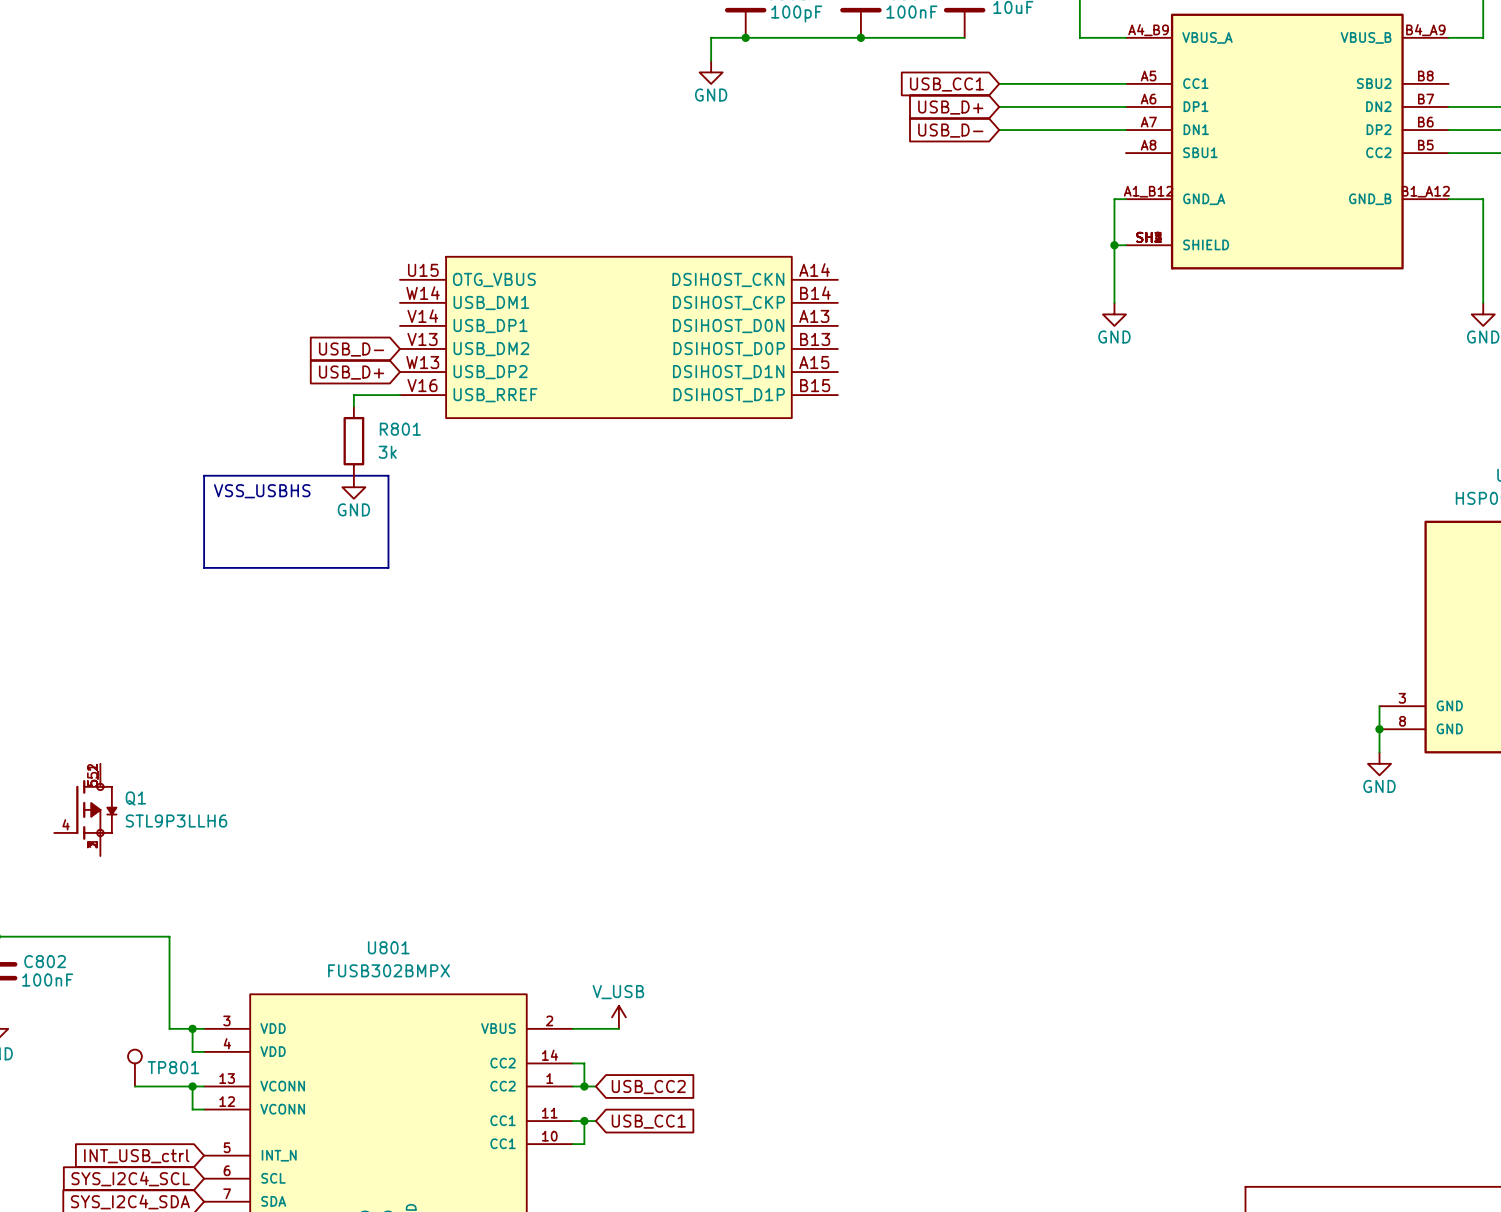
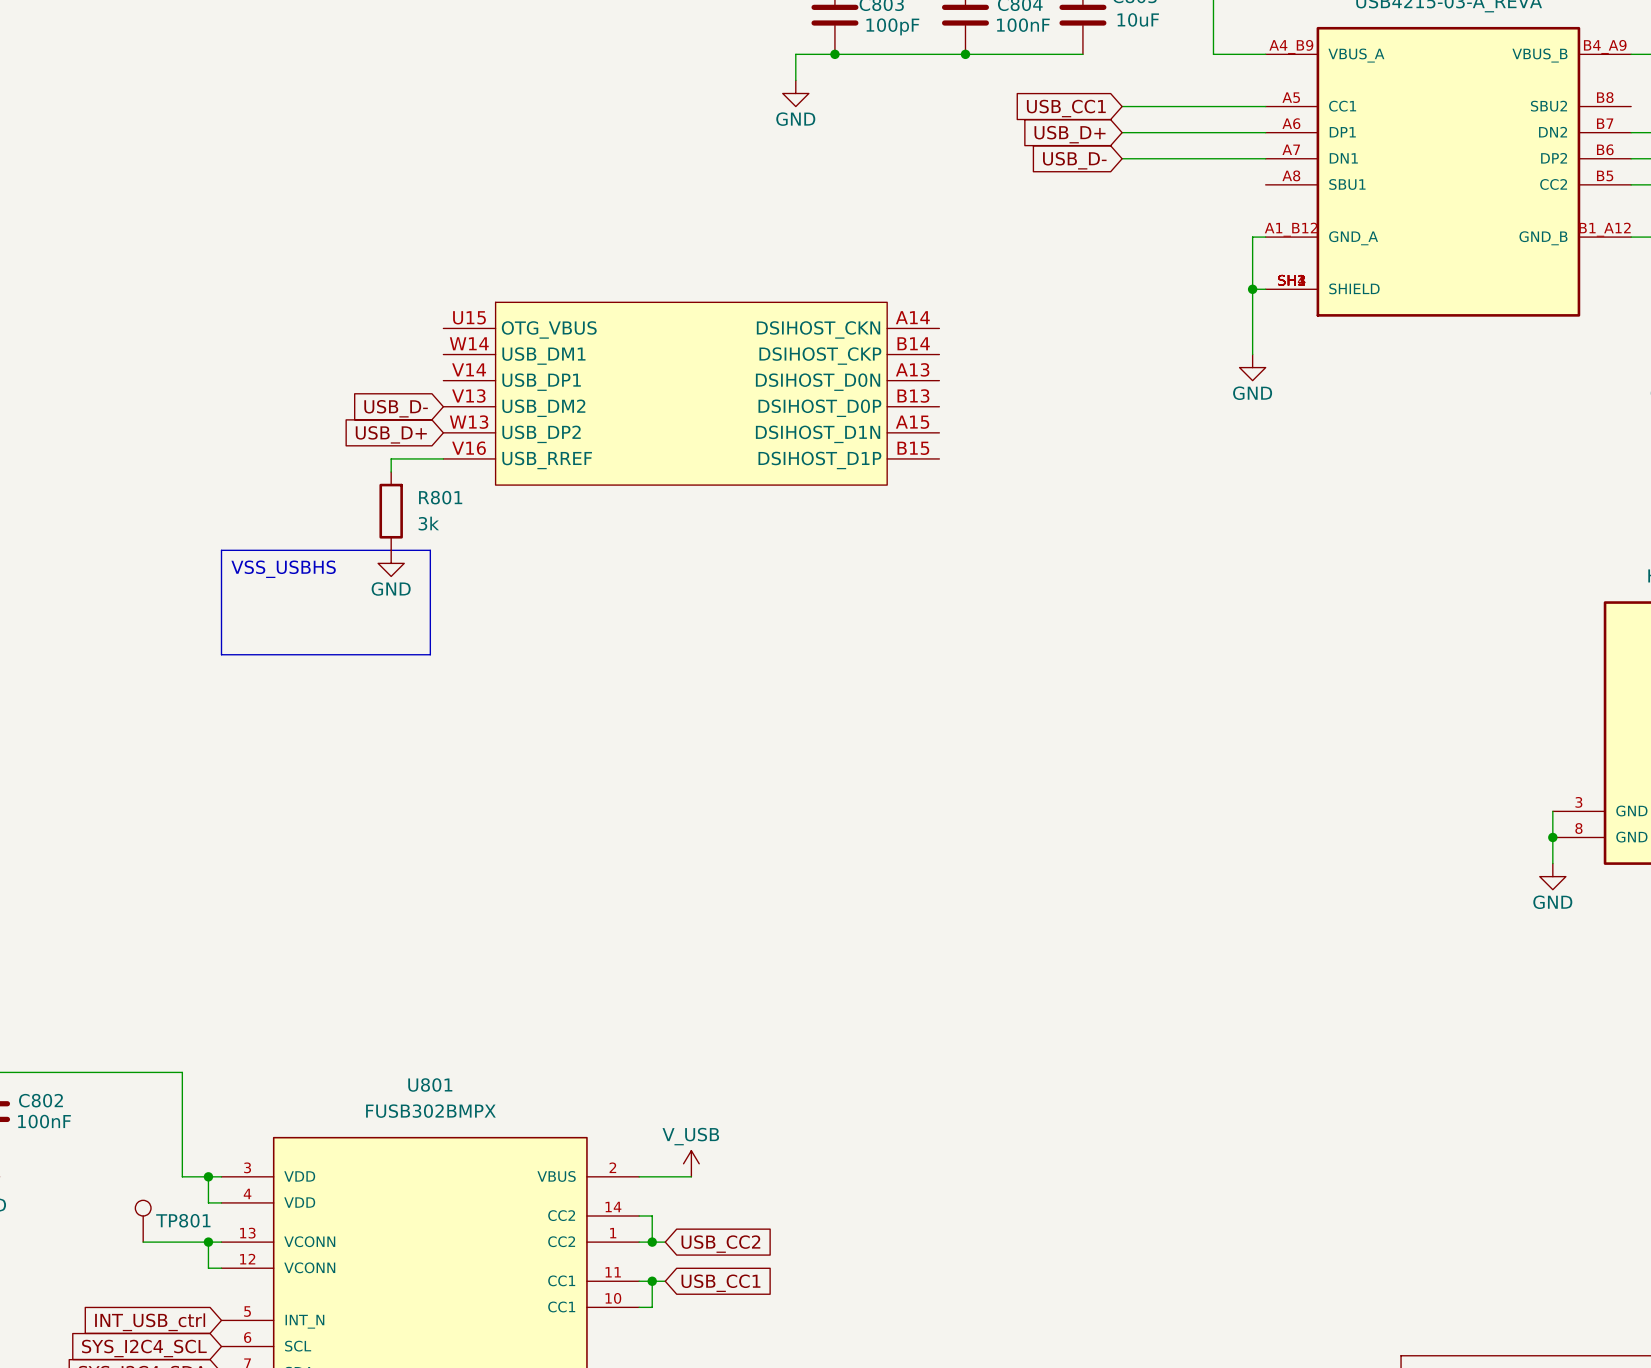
Q1: STL9P3LLH6 (85, 809) -> none

